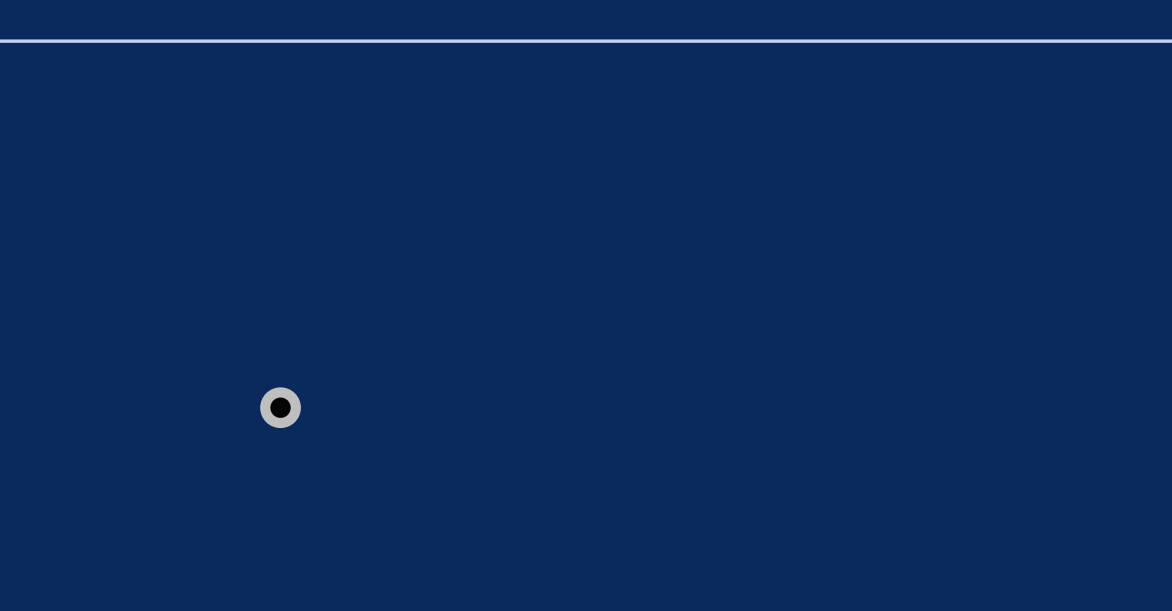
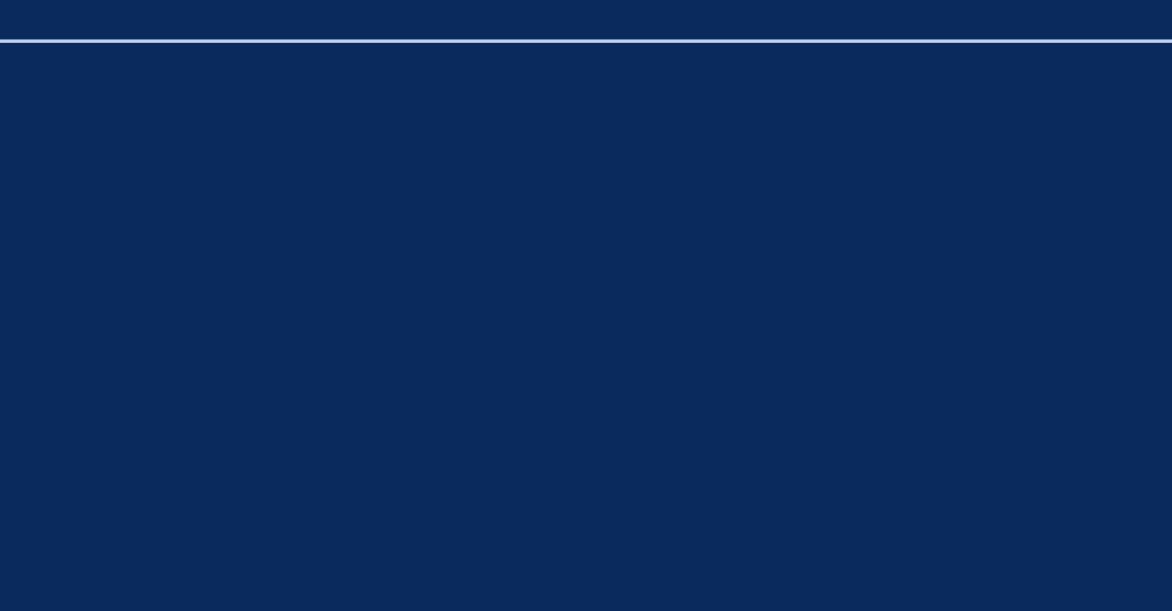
via: (280, 407) -> none

